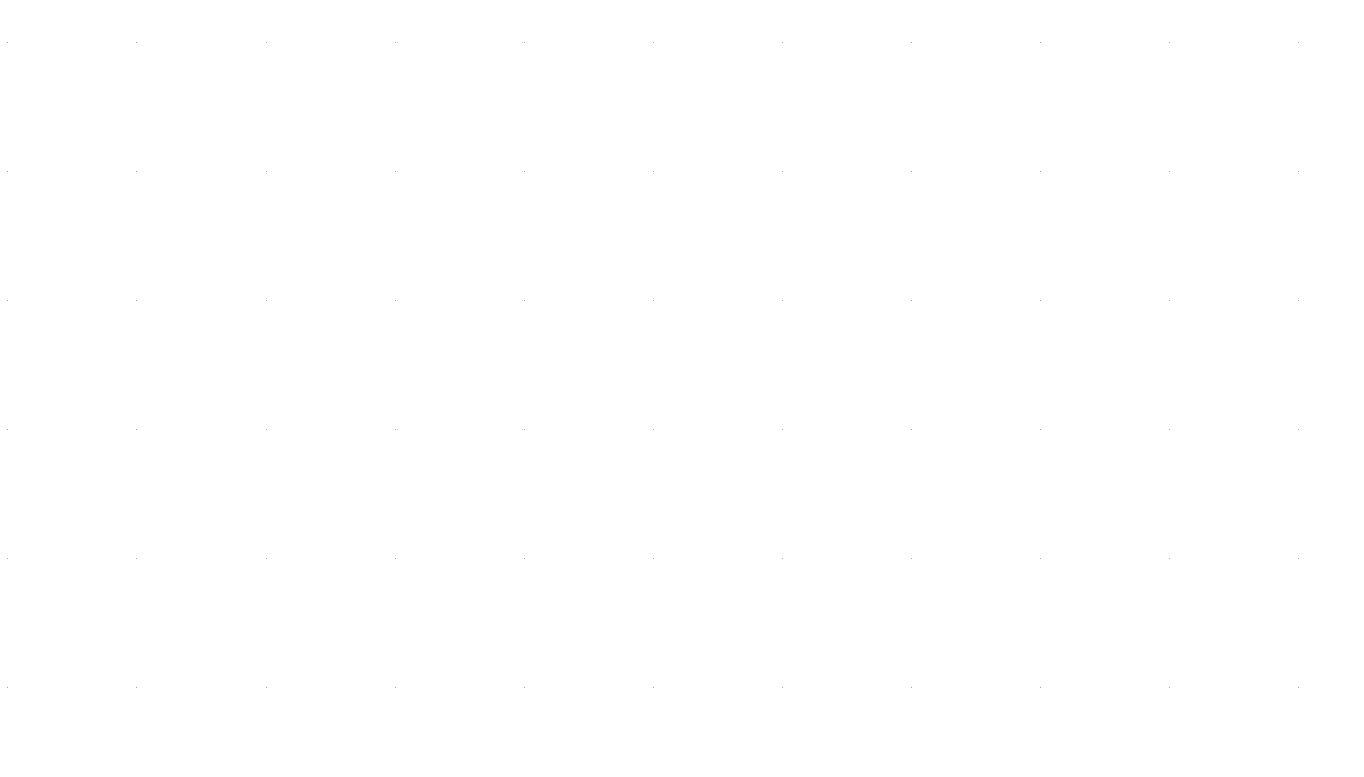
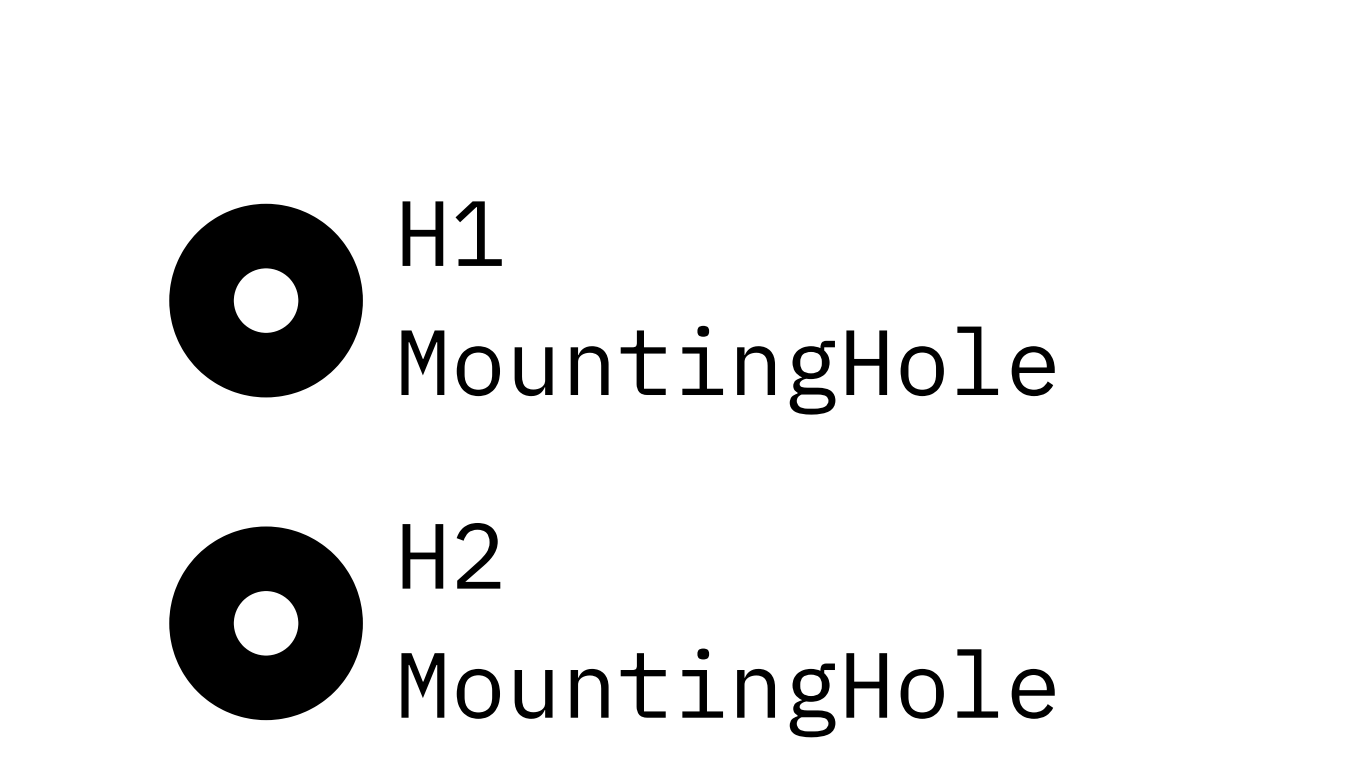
H1: none -> MountingHole (266, 300)
H2: none -> MountingHole (266, 623)

